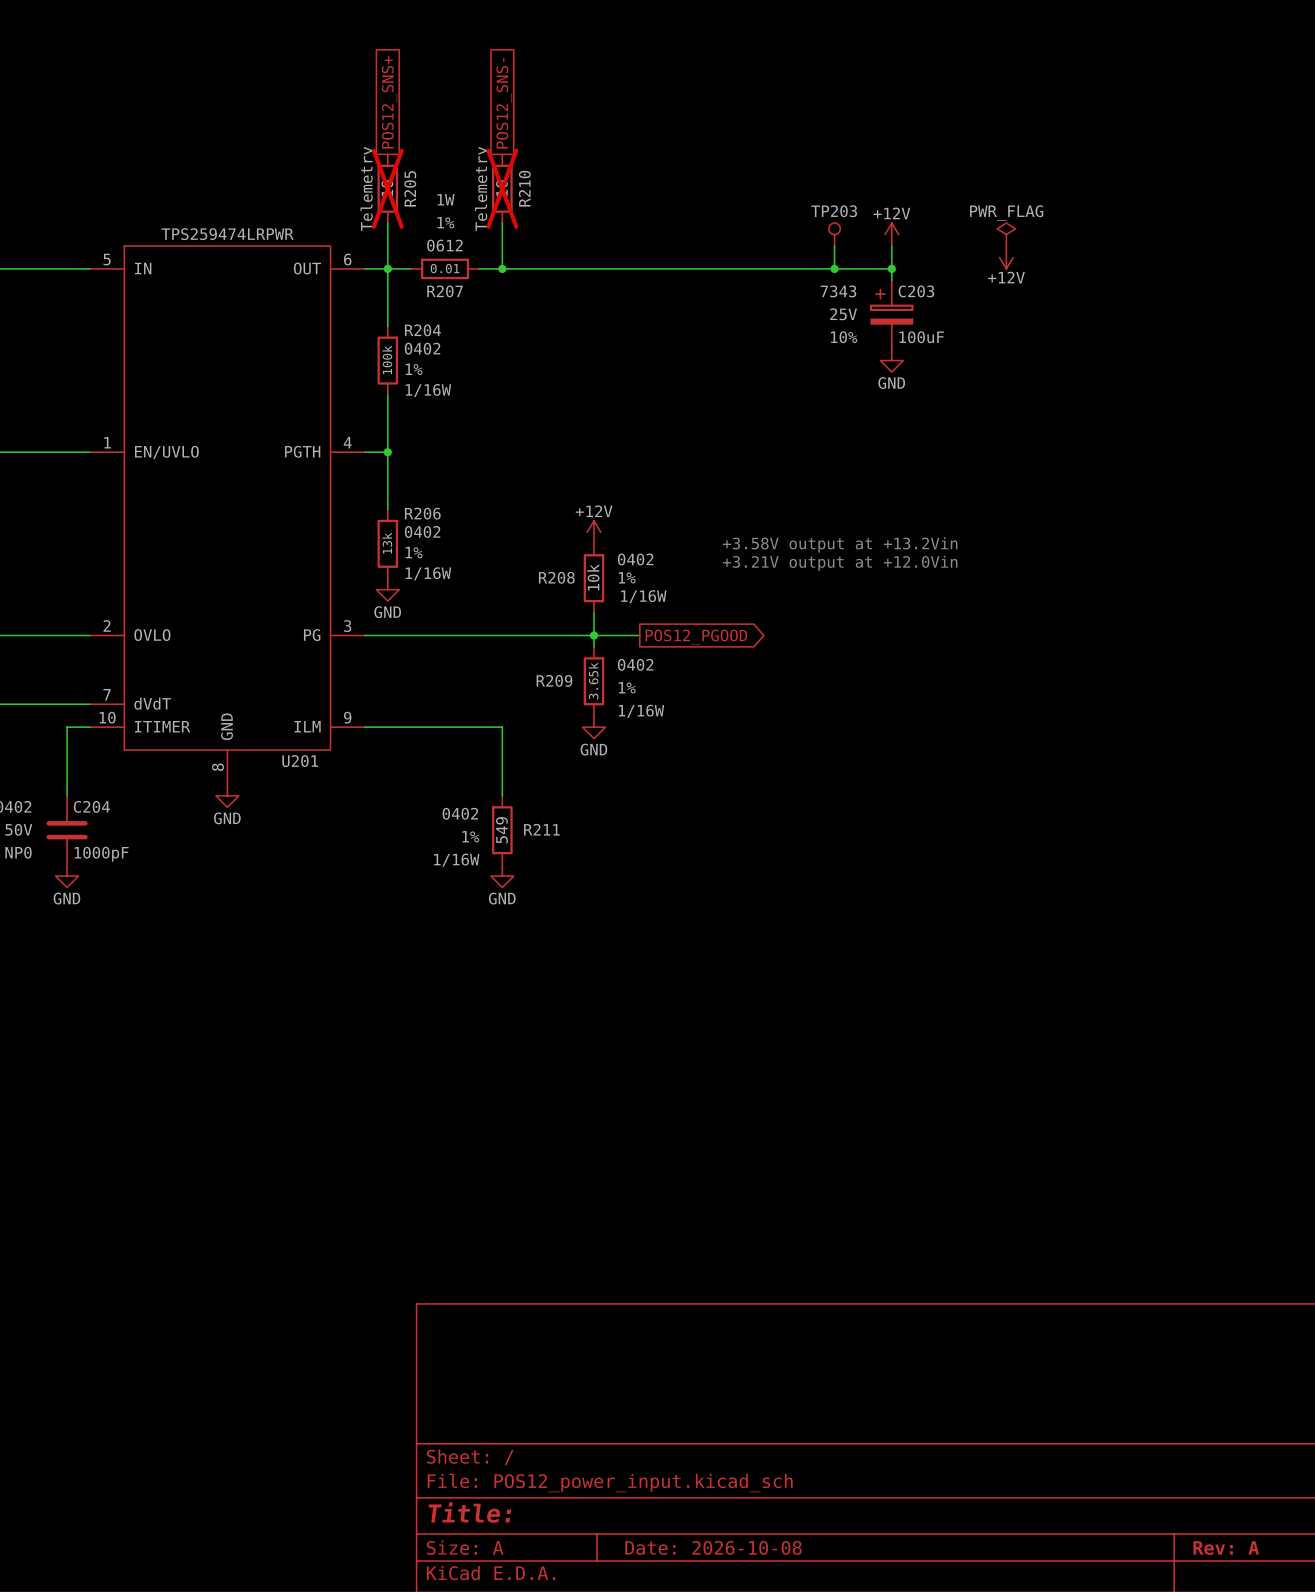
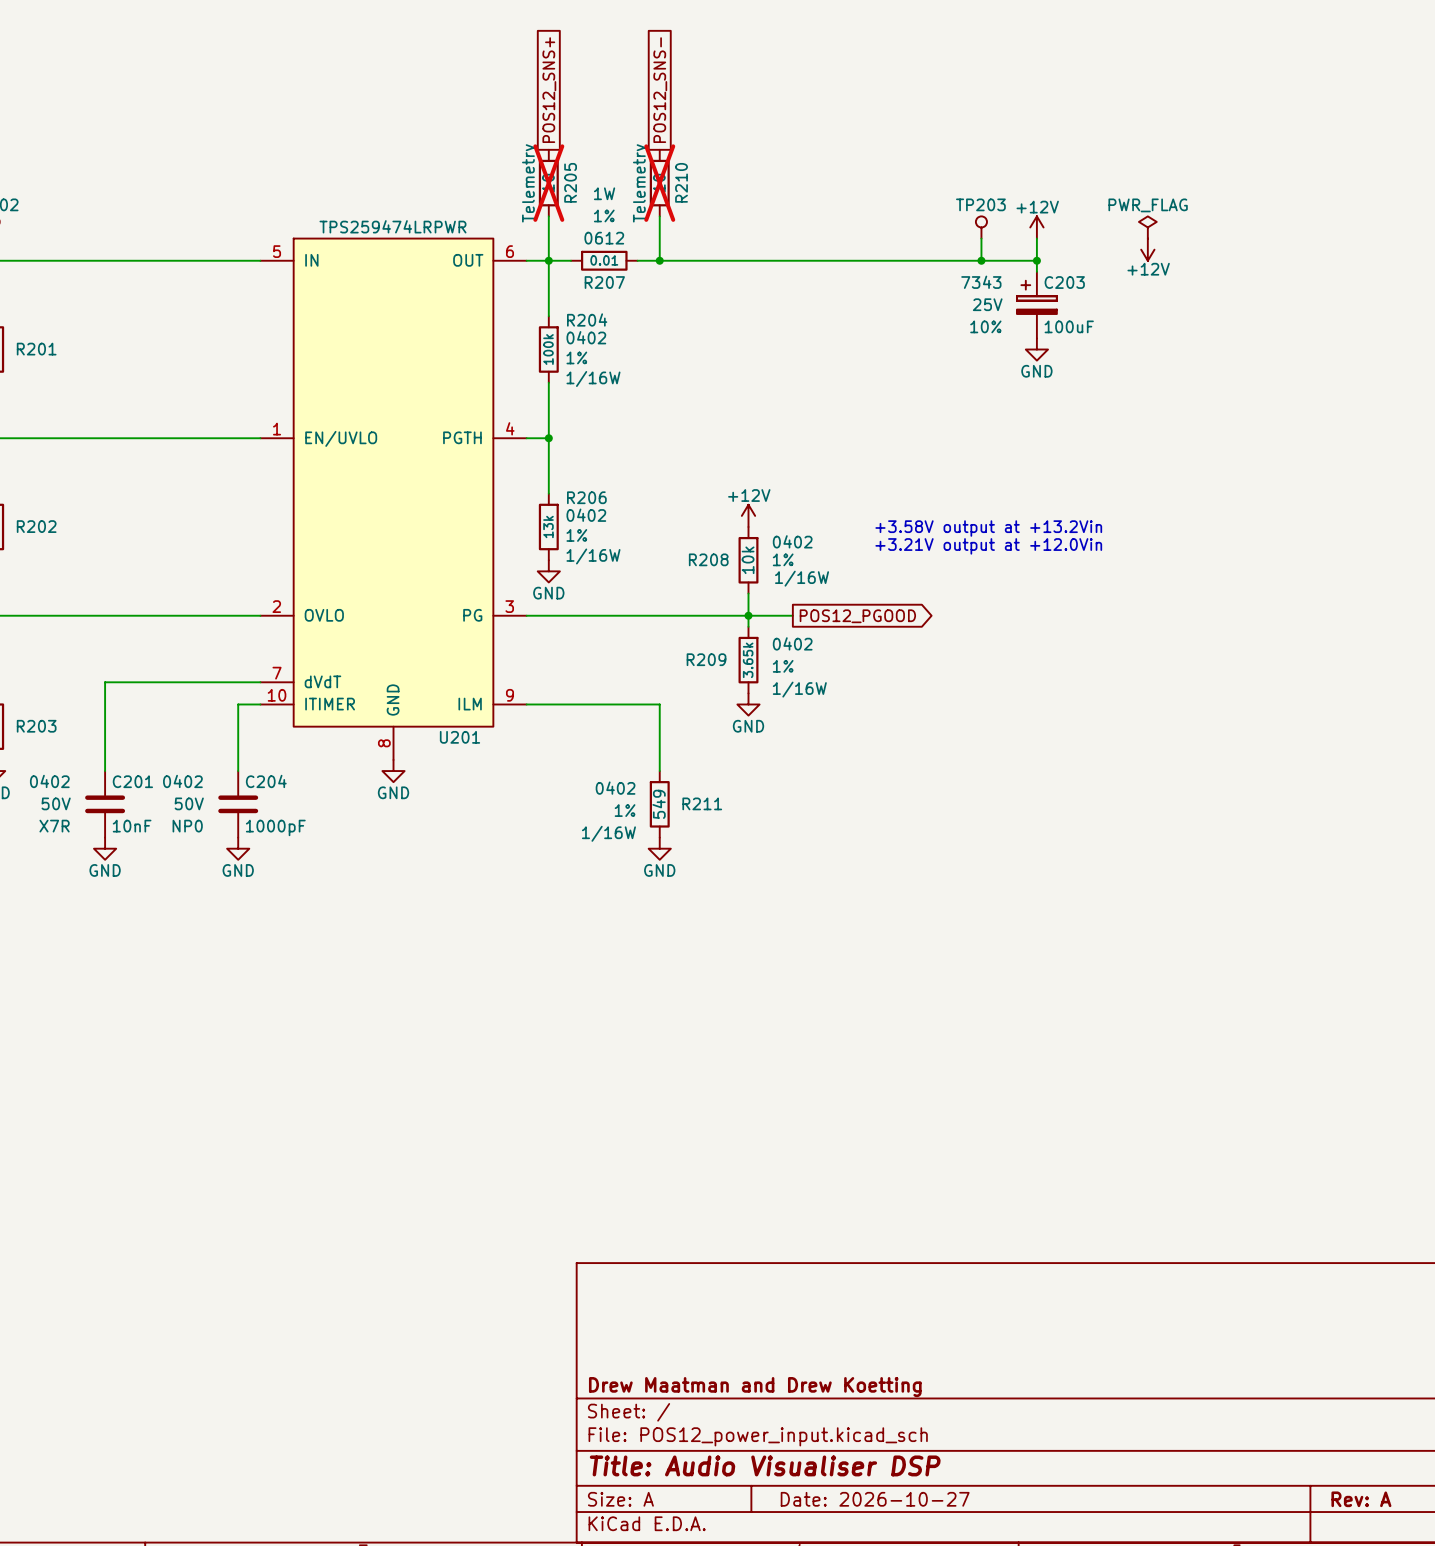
title block: none -> Drew Maatman and Drew Koetting (755, 1387)
title block: Title: (469, 1512) -> Title: Audio Visualiser DSP (765, 1465)
title block: Date: 2026-10-08 (713, 1547) -> Date: 2026-10-27 (875, 1499)

